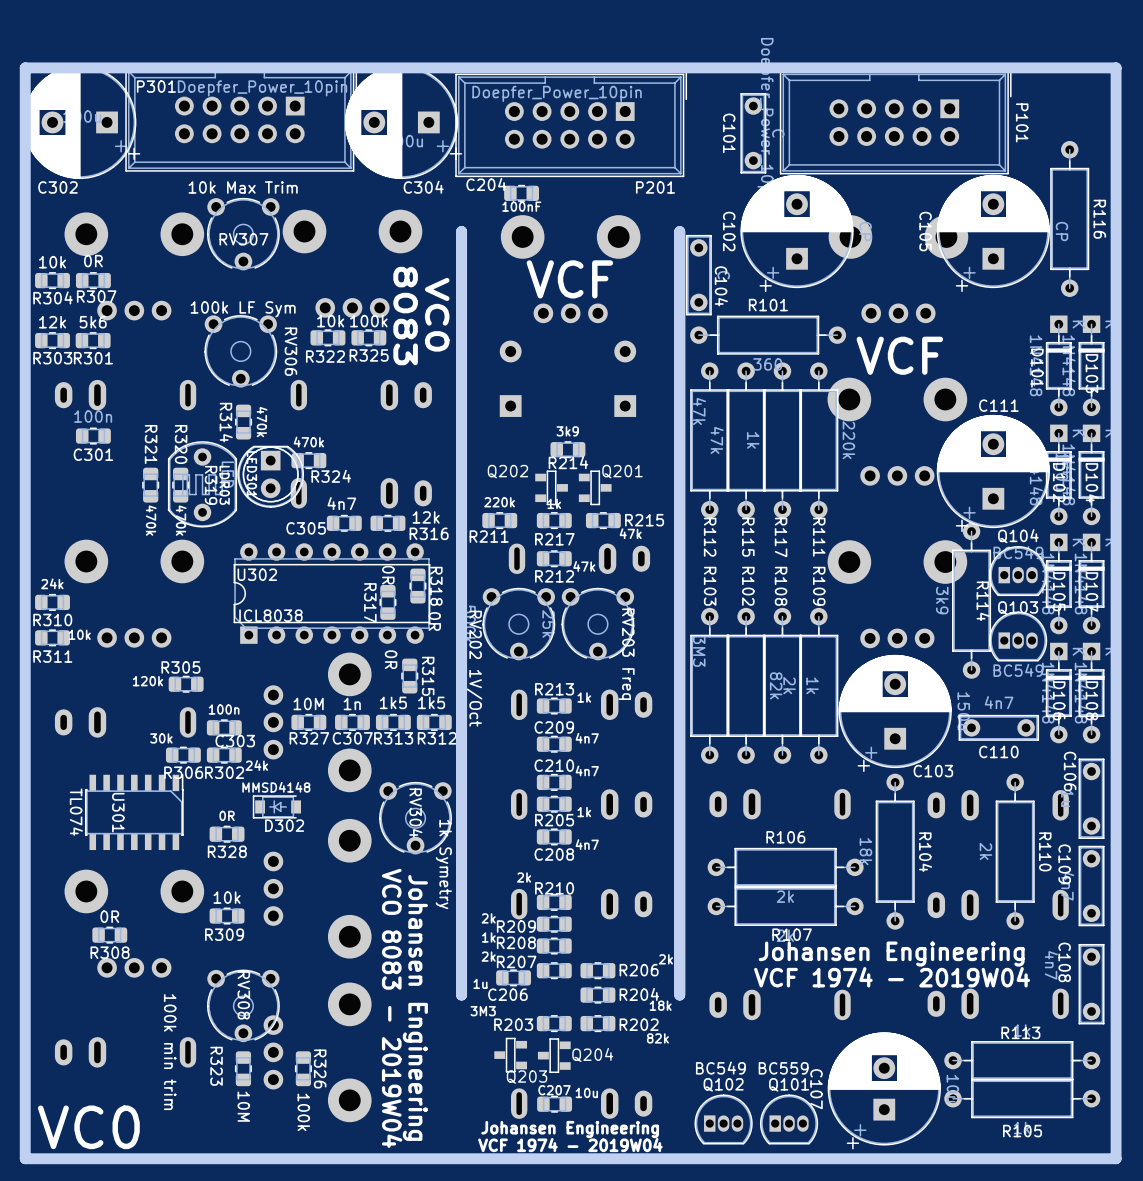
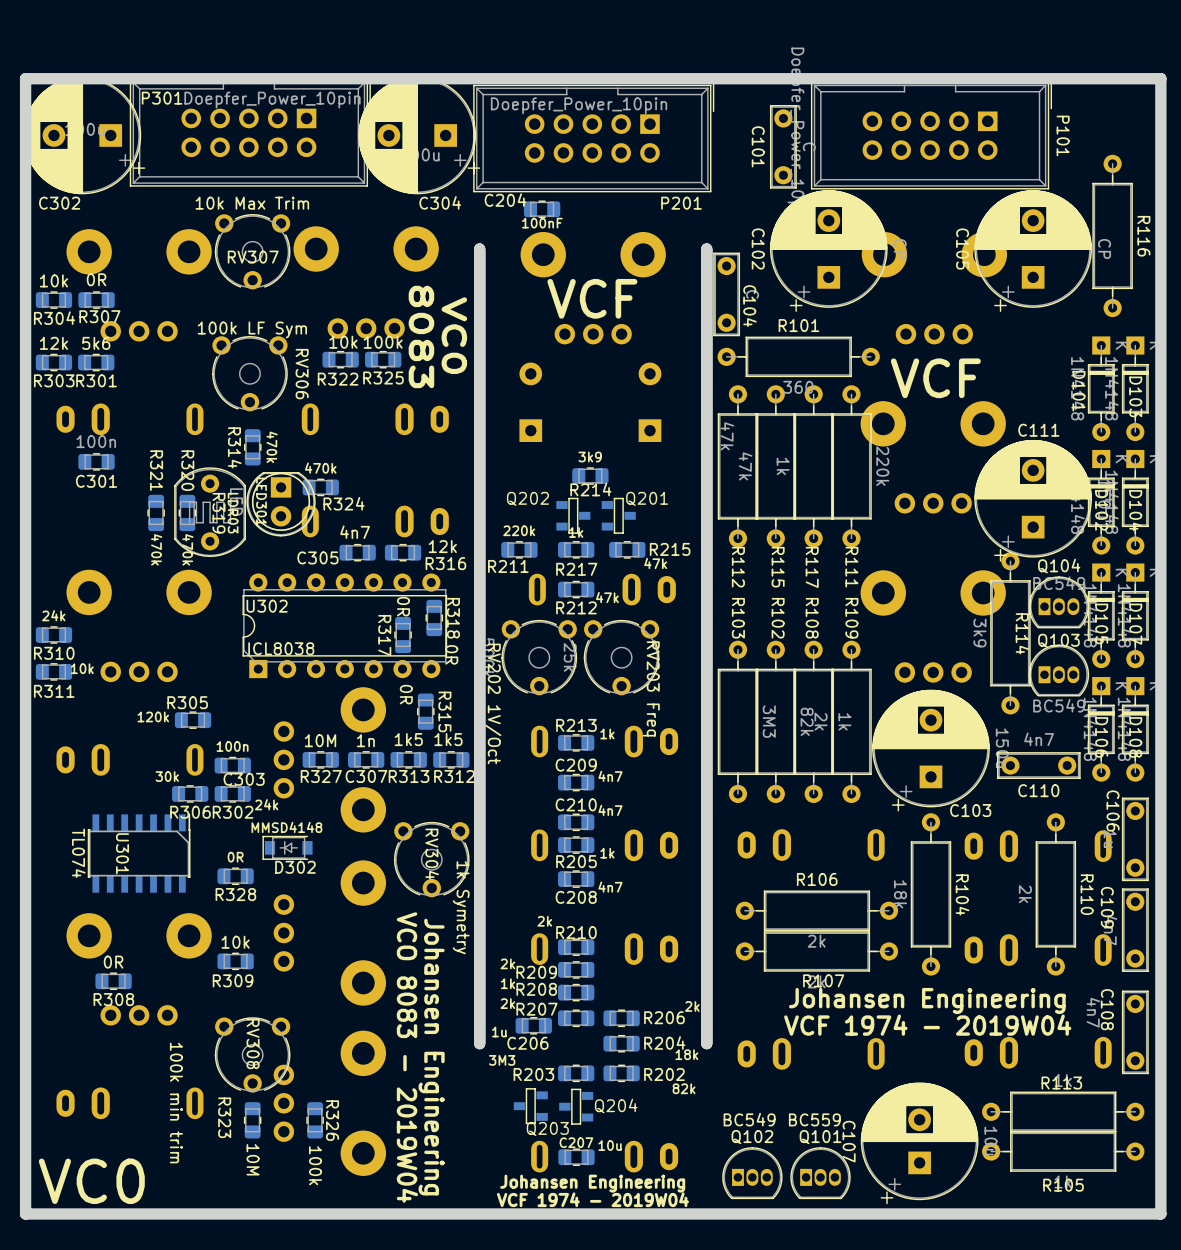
R103 value position: 3M3 (699, 651) -> 3M3 (769, 721)

